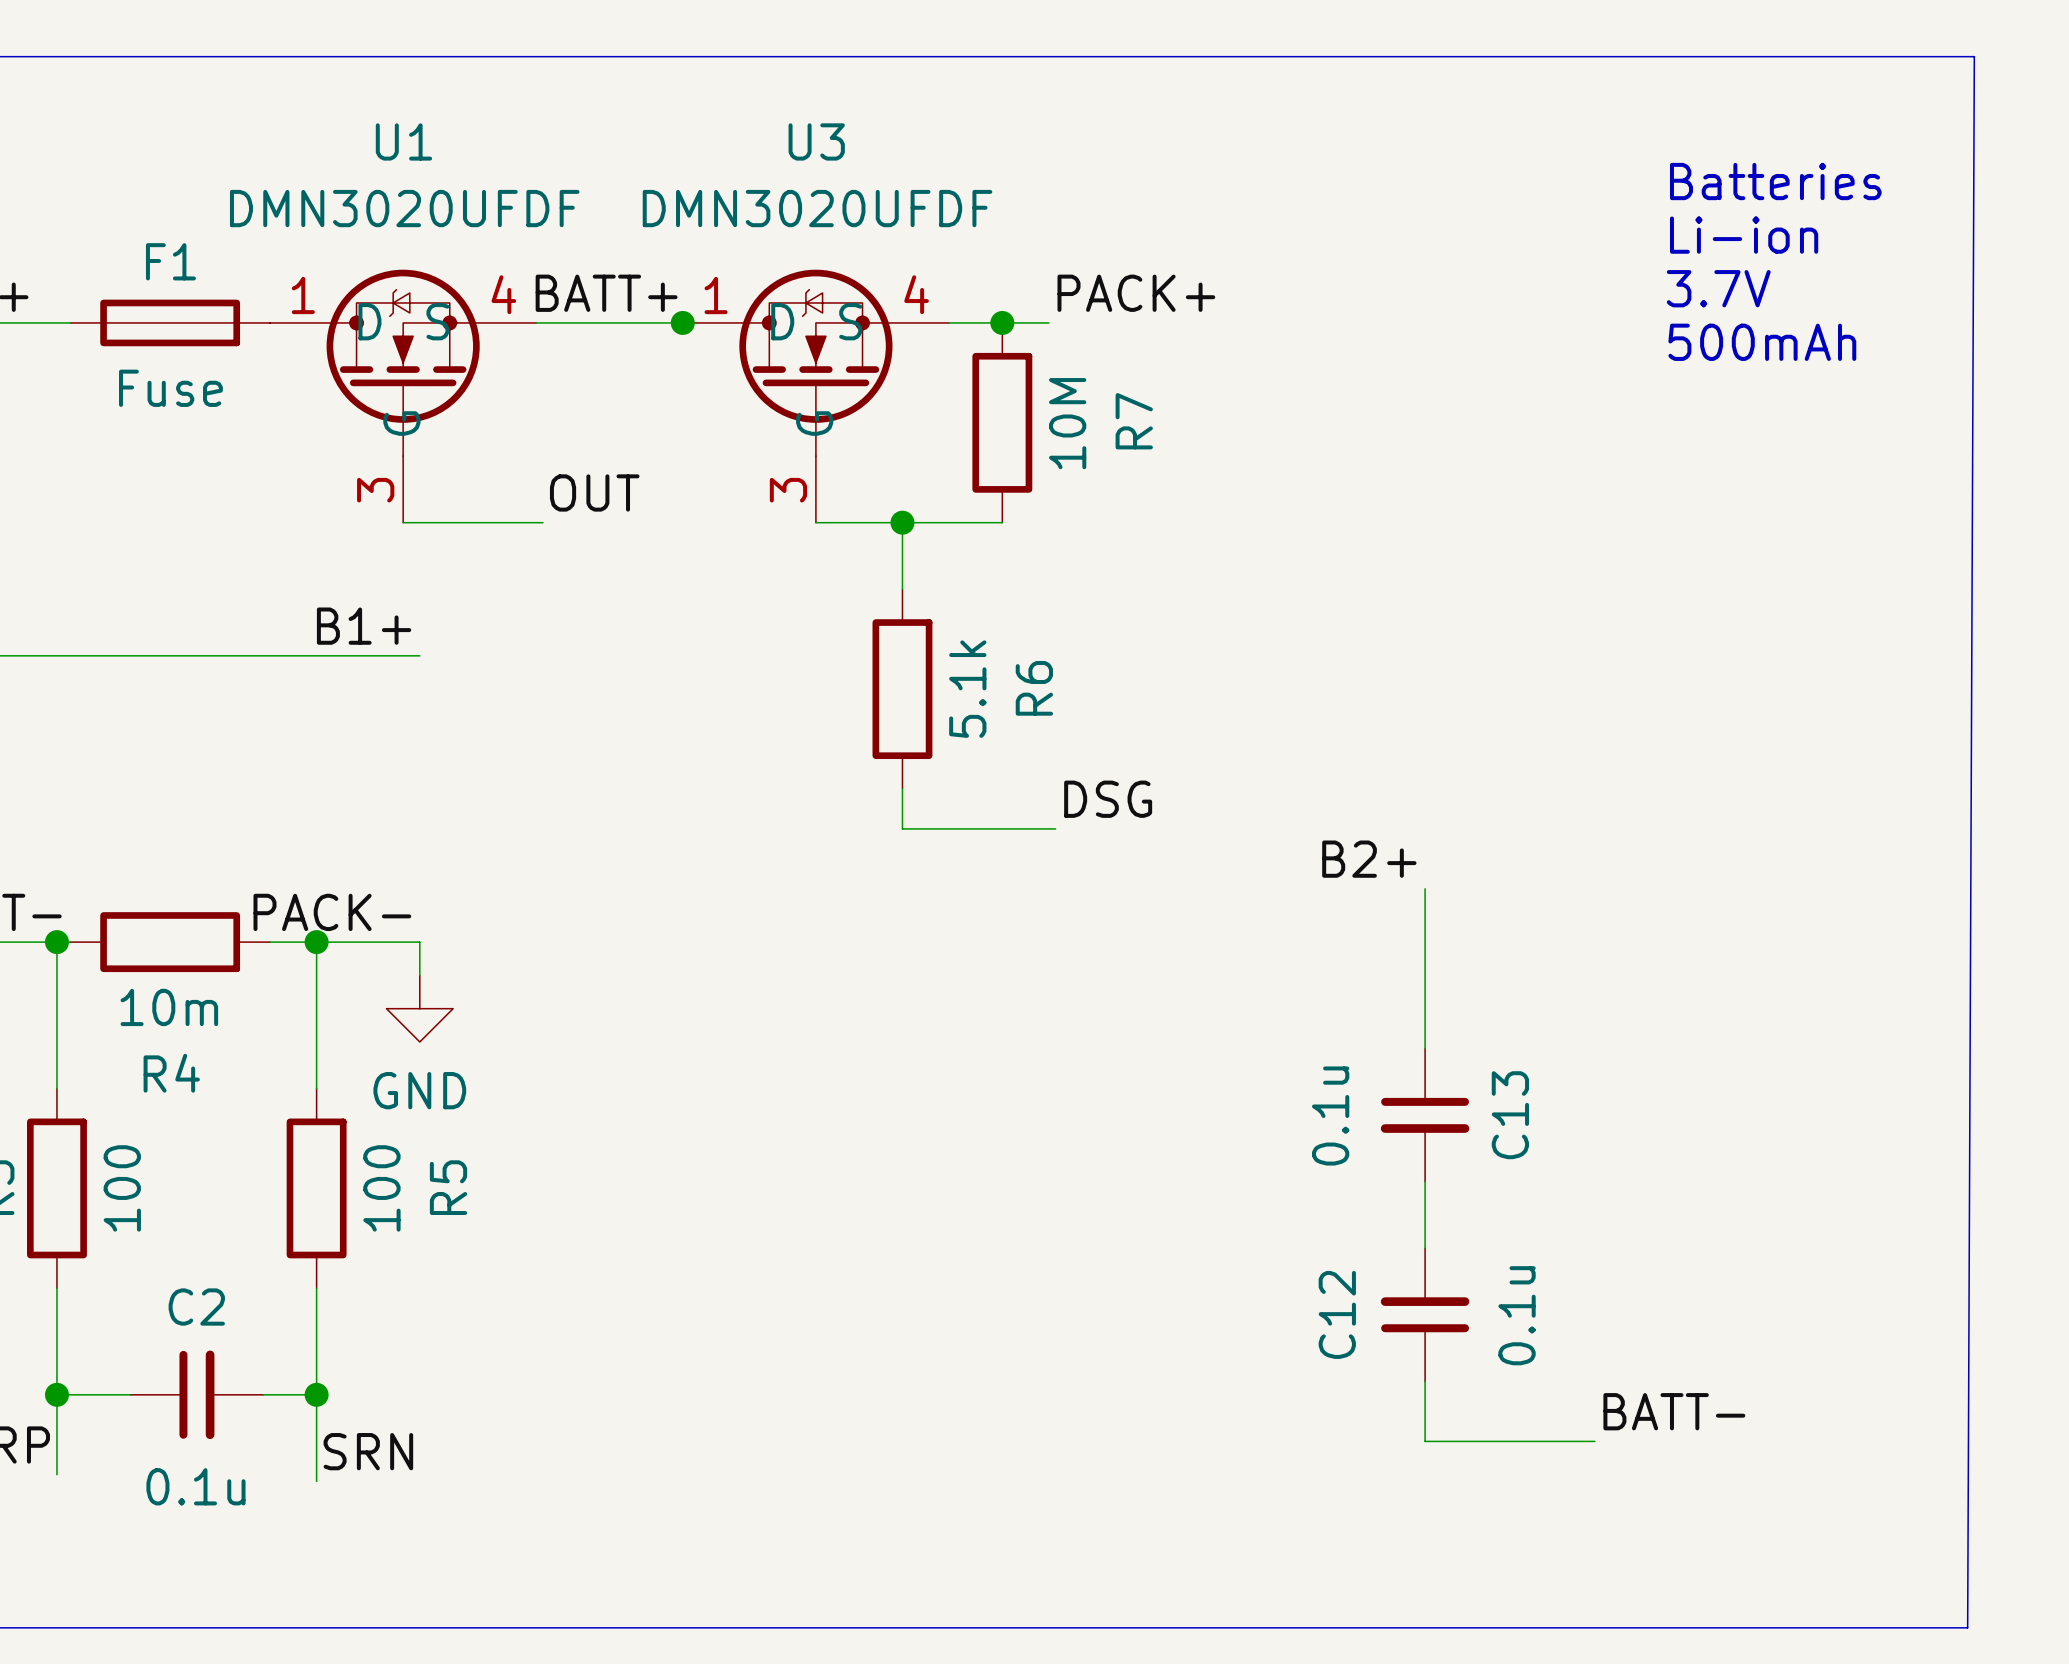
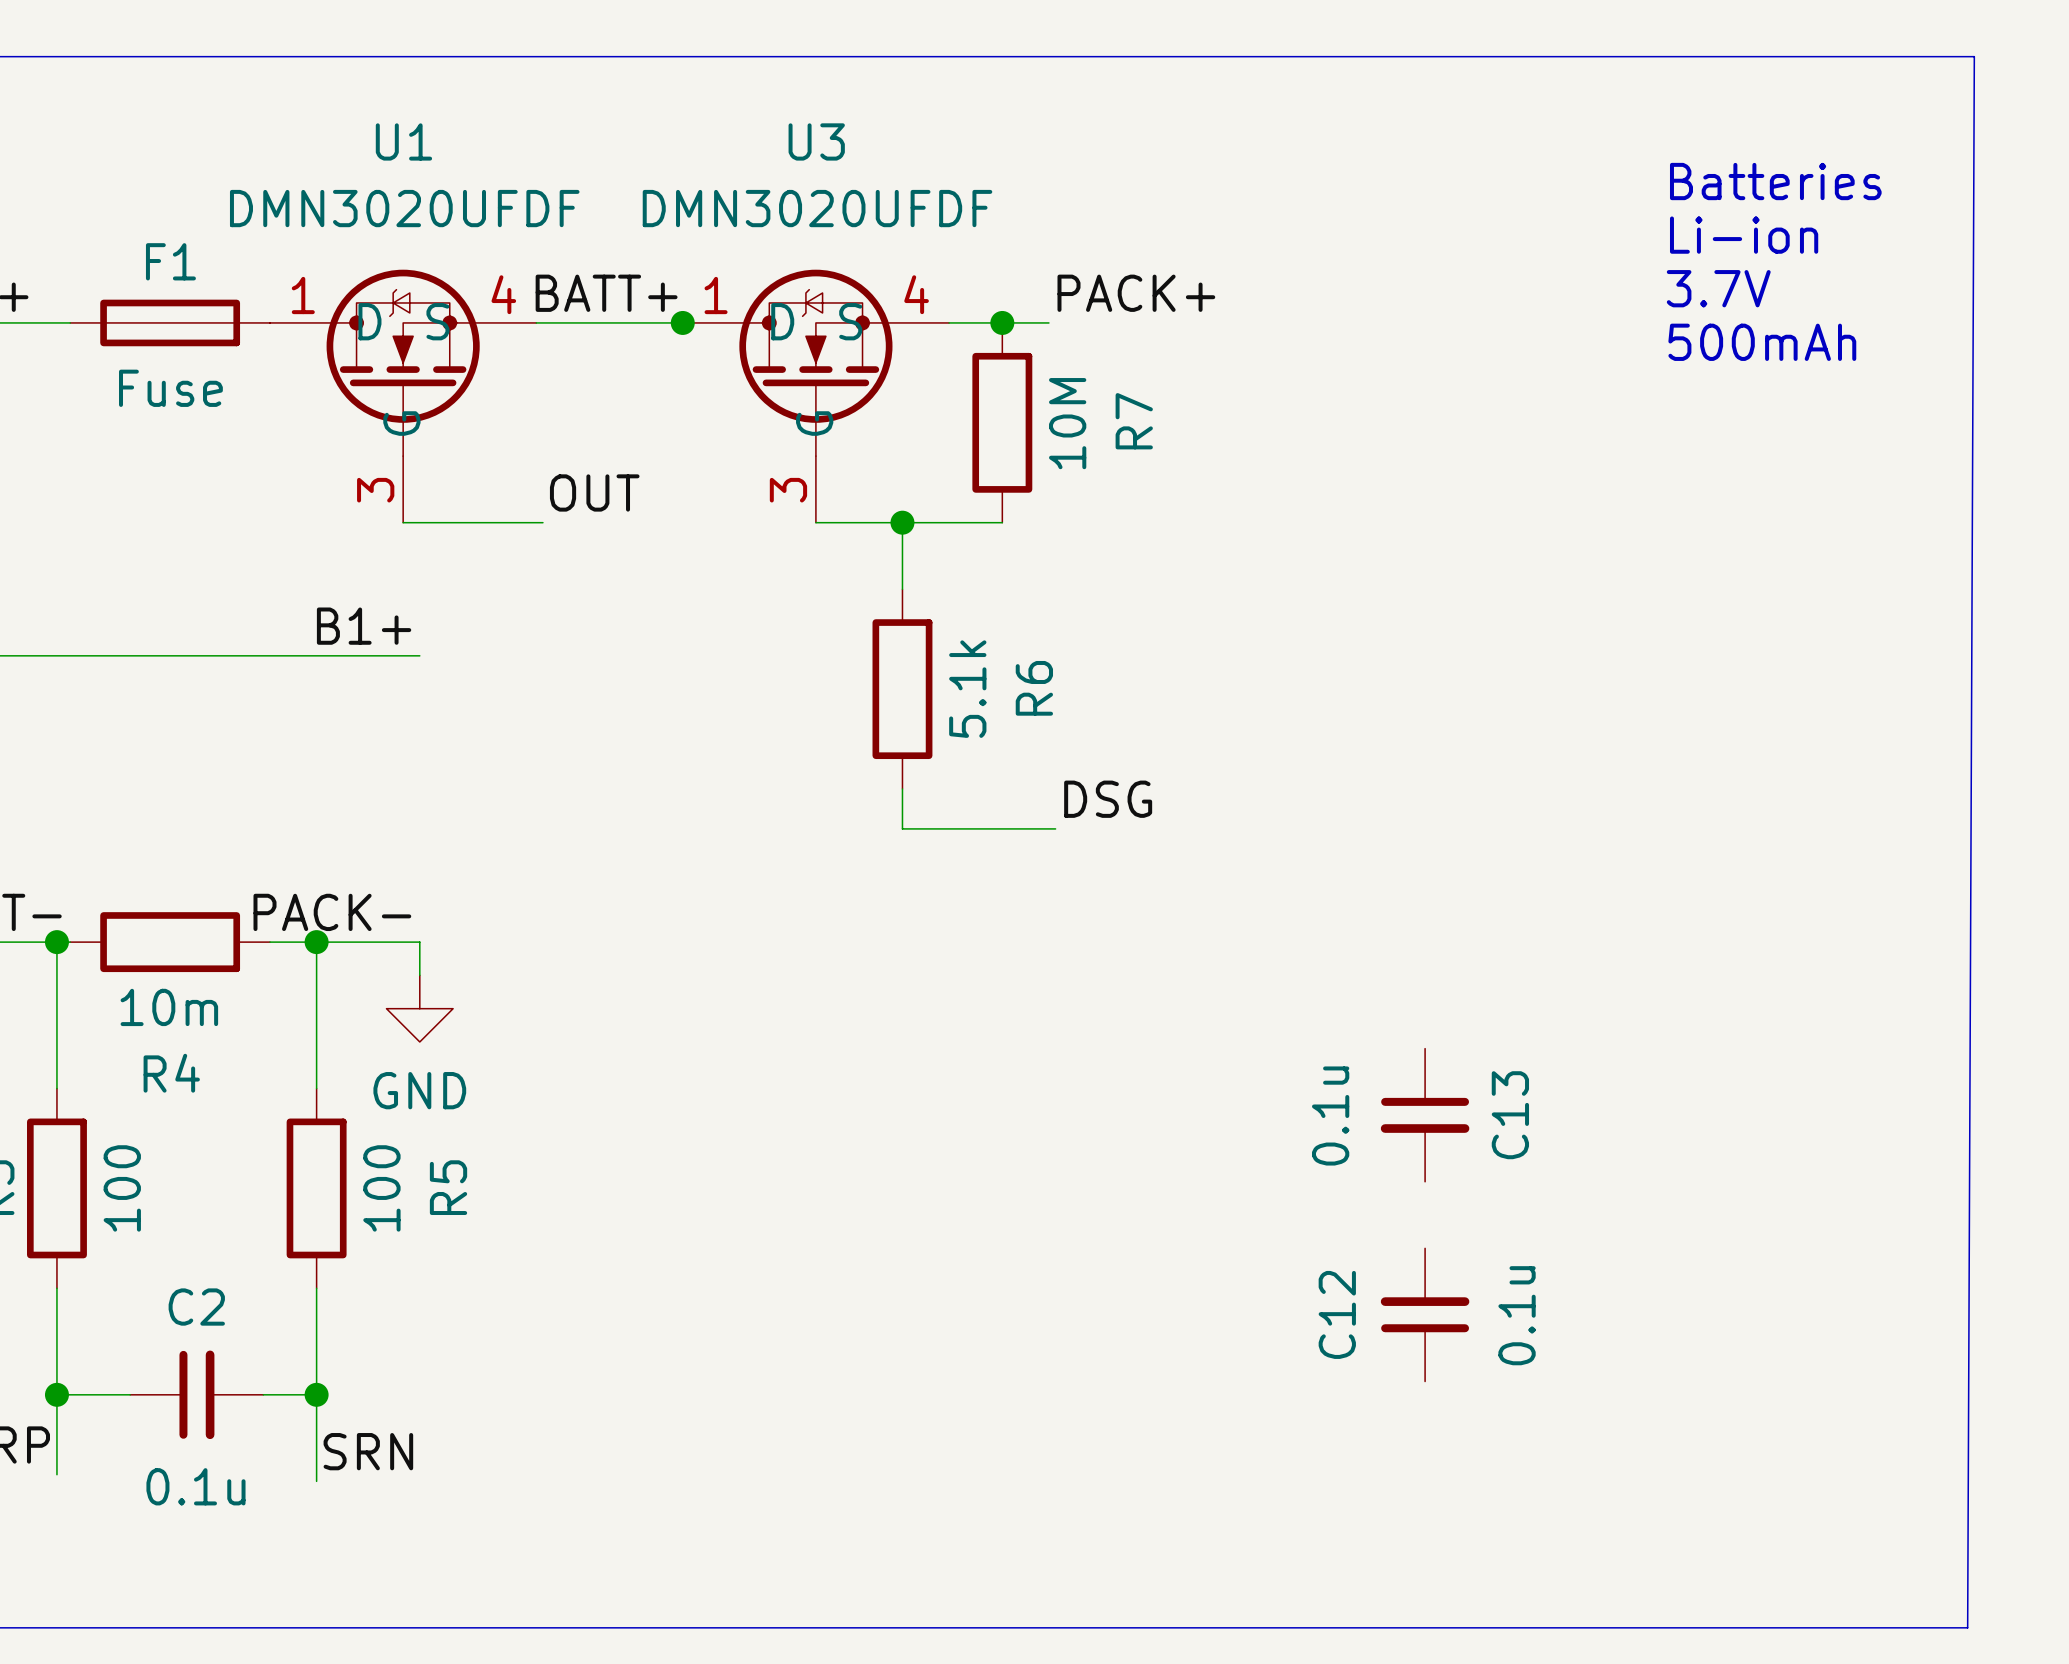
label: B2+ (1369, 859) -> none
wire: (1425, 888) (1425, 1048) -> none
wire: (1425, 1181) (1425, 1248) -> none
wire: (1425, 1381) (1425, 1441) (1594, 1441) -> none
label: BATT- (1674, 1411) -> none

